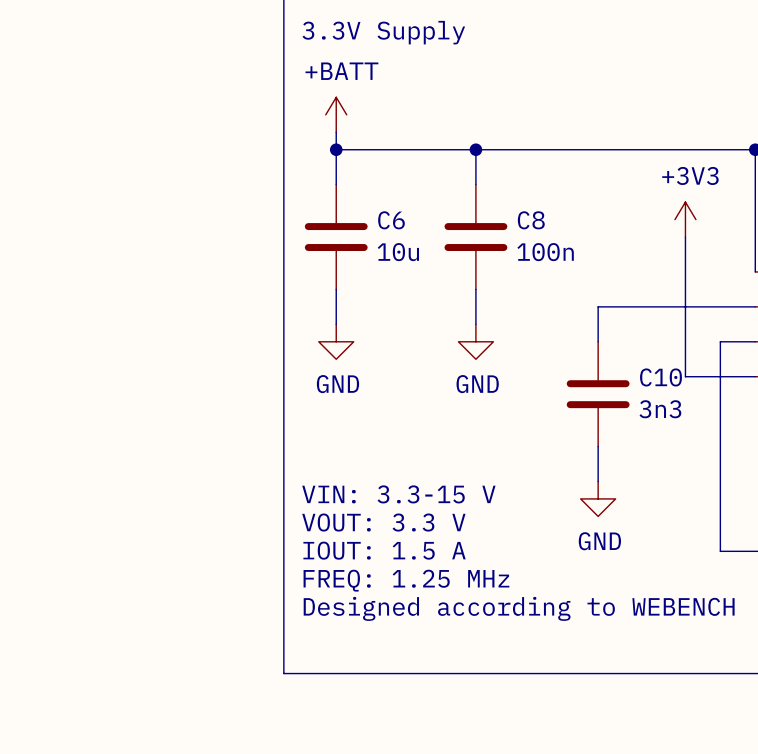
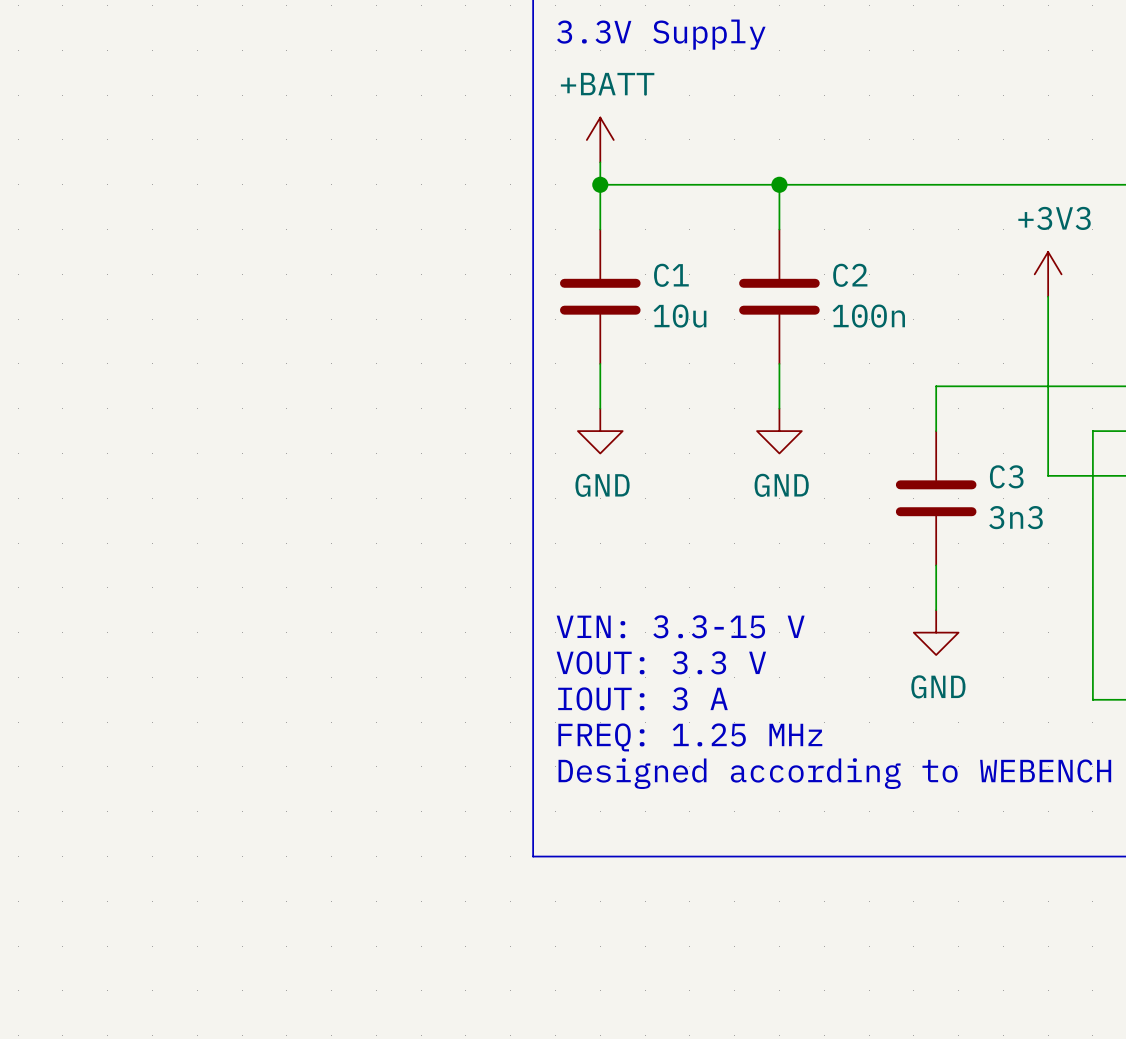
C6 name: C6 (391, 220) -> C1 (671, 275)
C8 name: C8 (531, 220) -> C2 (850, 275)
C10 name: C10 (660, 377) -> C3 (1006, 476)
text: IOUT: 1.5 A (384, 550) -> IOUT: 3 A (642, 698)

